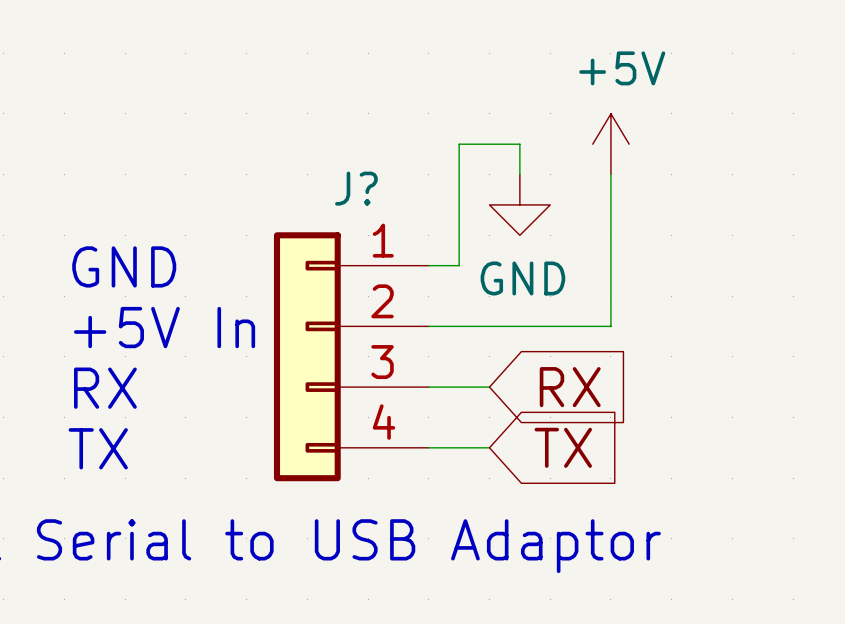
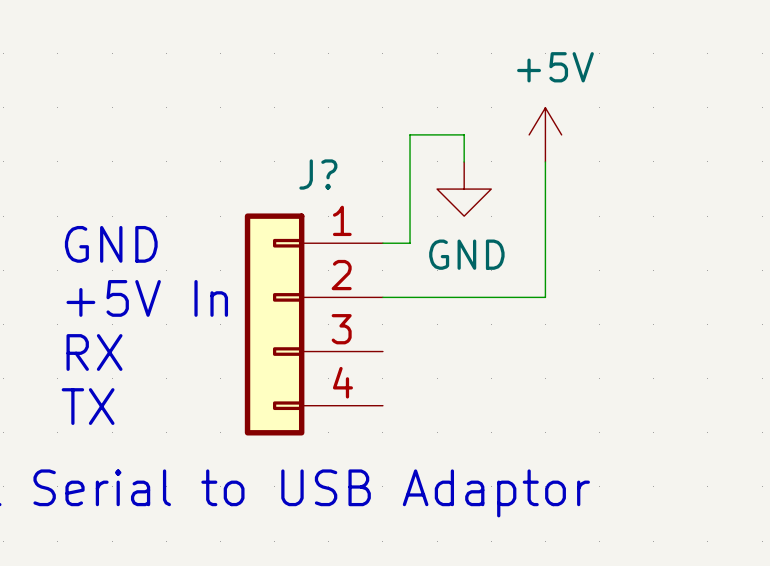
wire: (428, 387) (489, 387) -> none
global label: RX (570, 387) -> none
wire: (428, 447) (489, 447) -> none
global label: TX (563, 447) -> none

